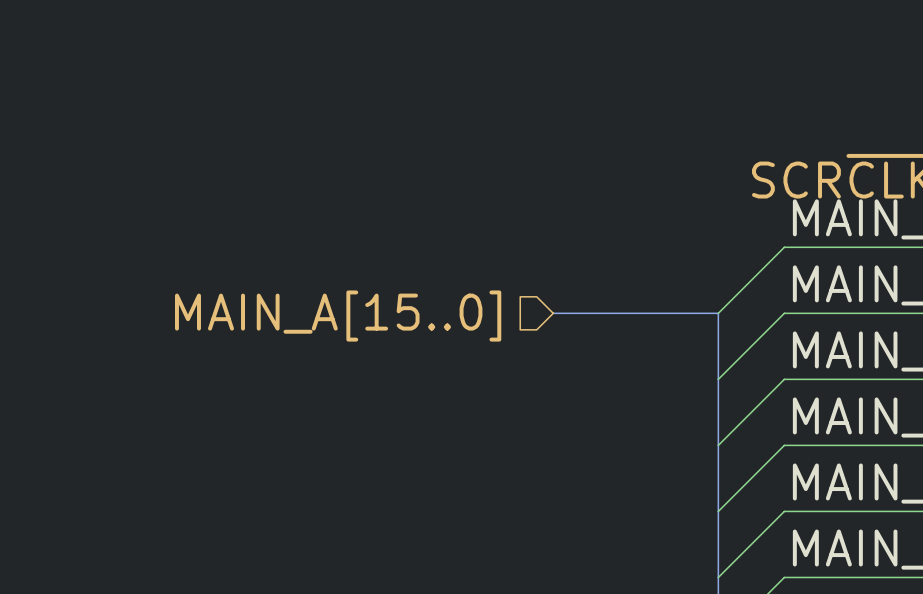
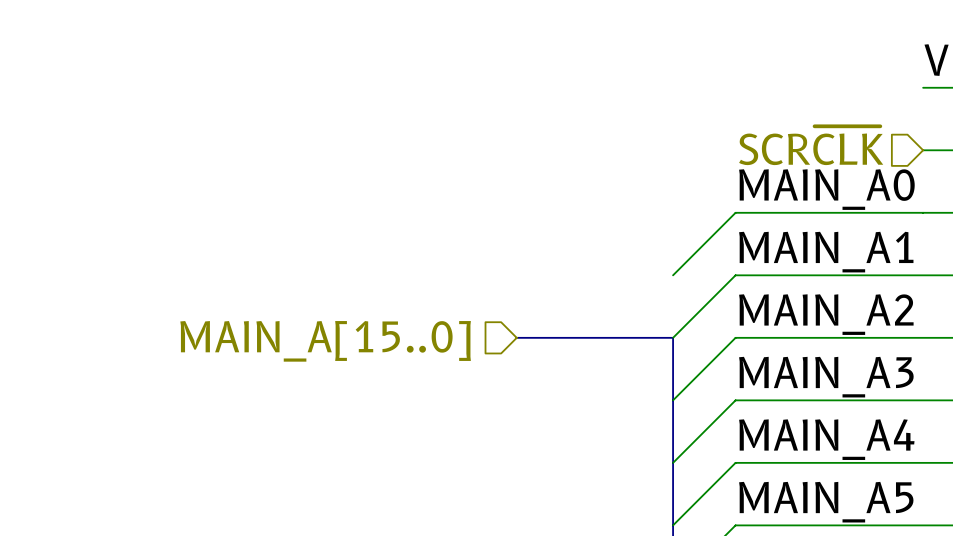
bus: (553, 313) (718, 313) (718, 379) -> (516, 337) (673, 337)
hierarchical label position: MAIN_A[15..0] (338, 316) -> MAIN_A[15..0] (325, 341)

